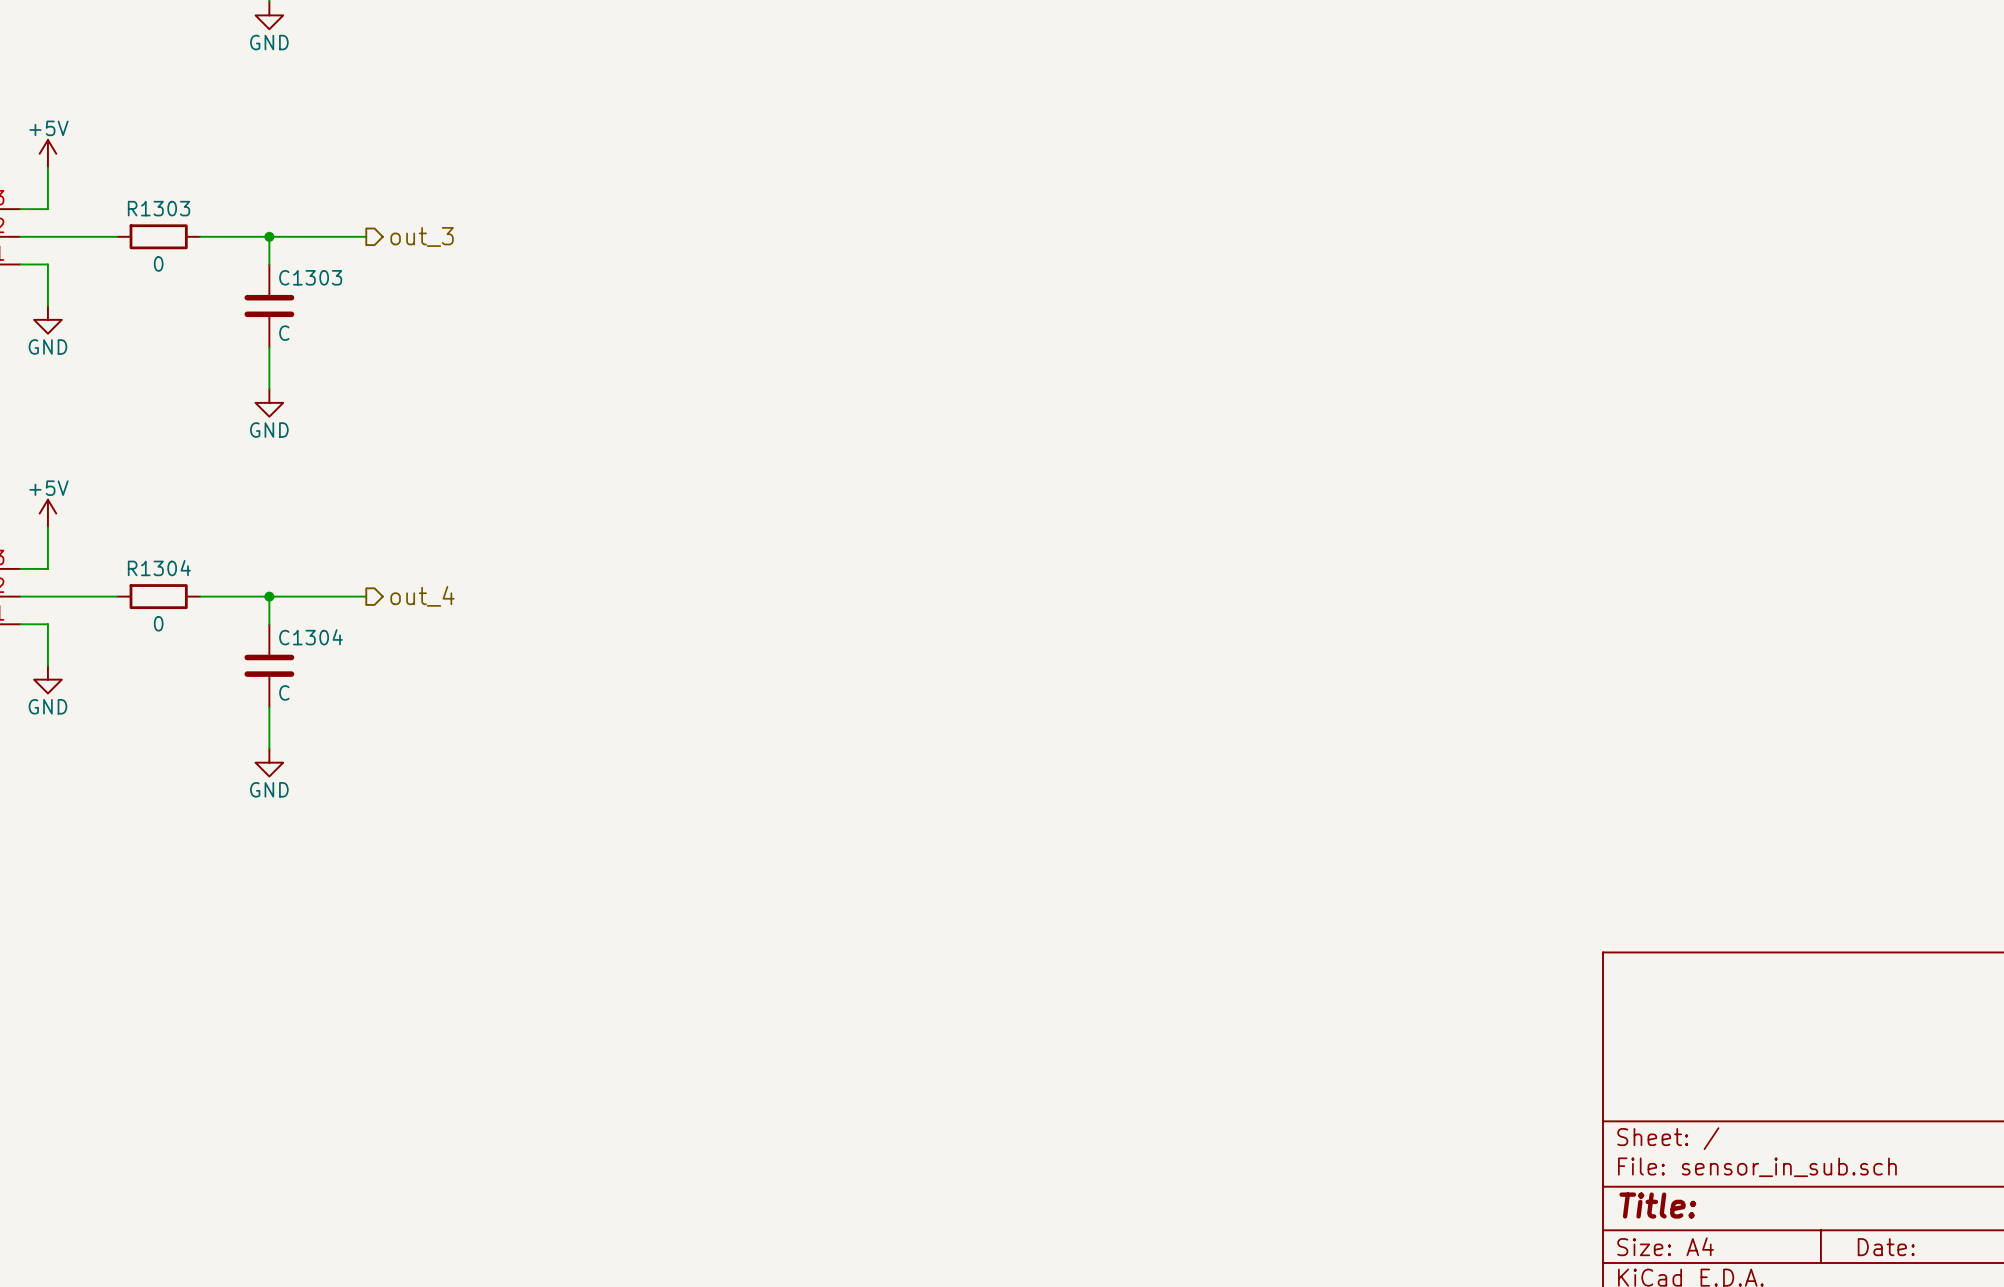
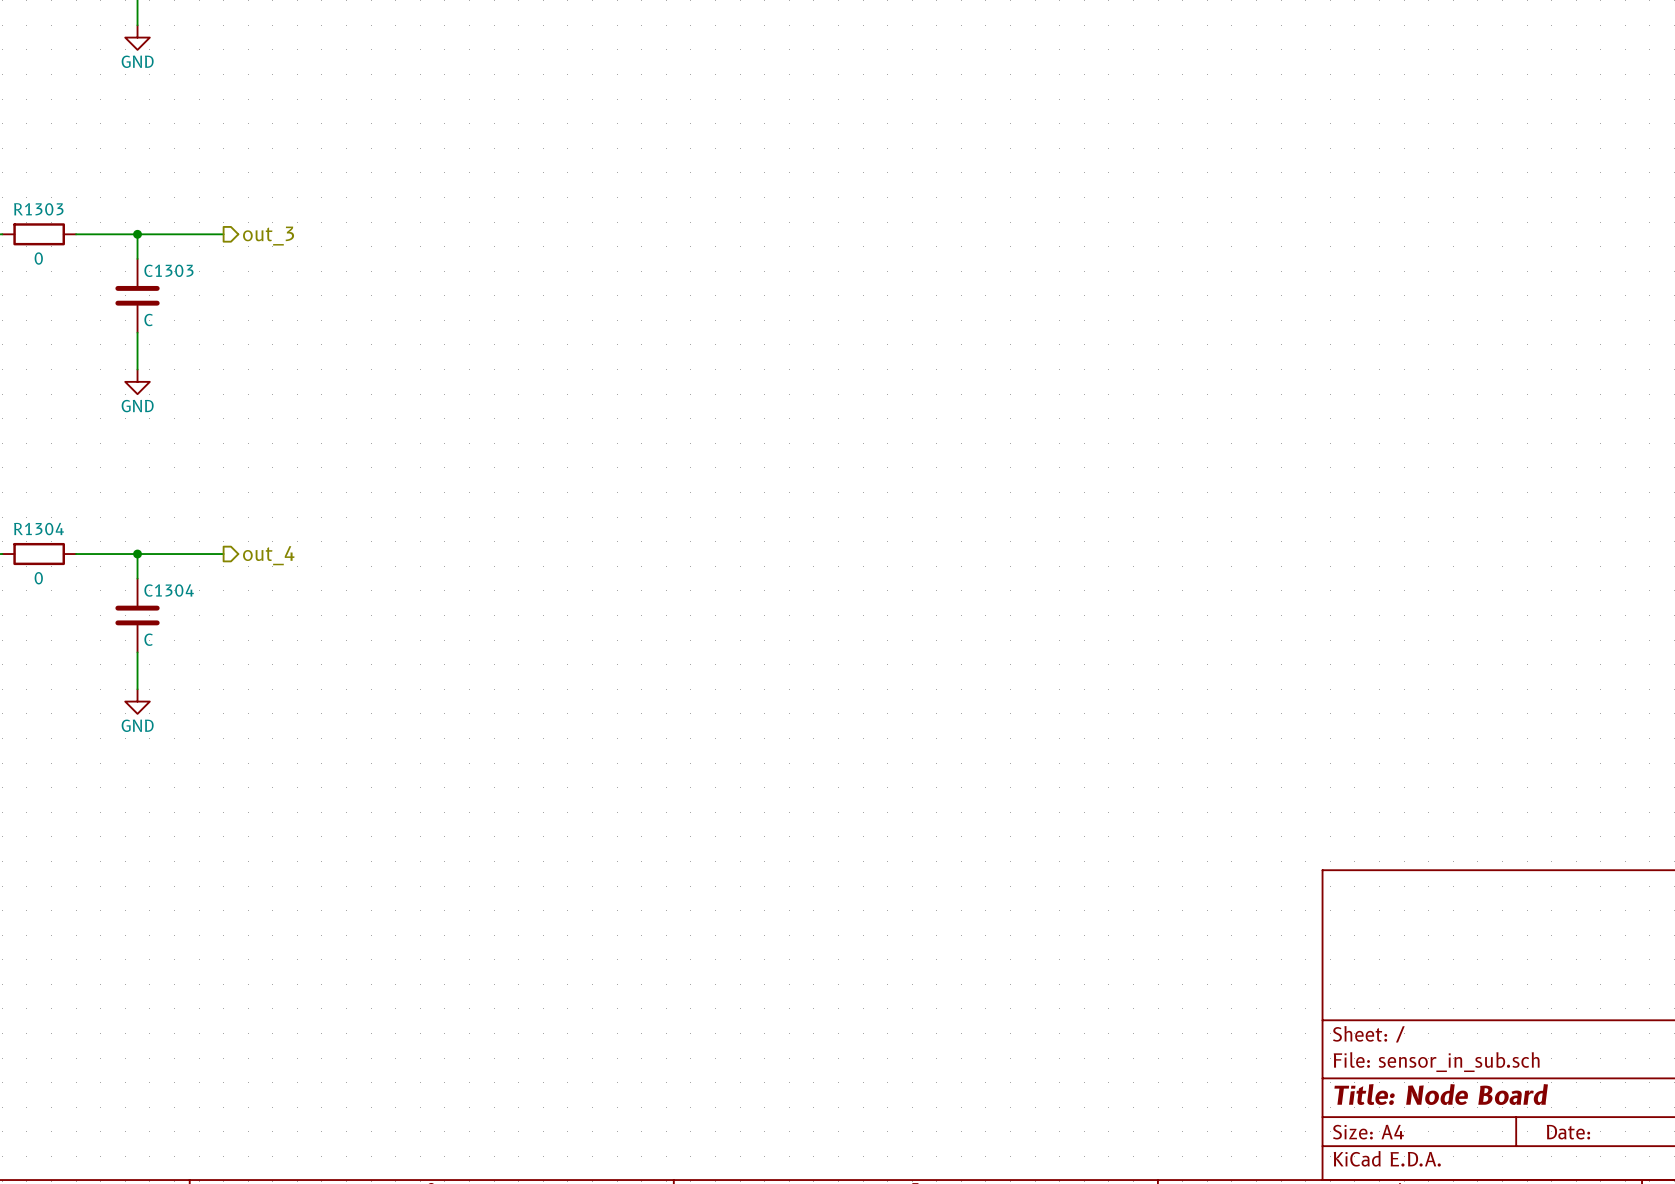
title block: Title: (1657, 1205) -> Title: Node Board (1441, 1094)

